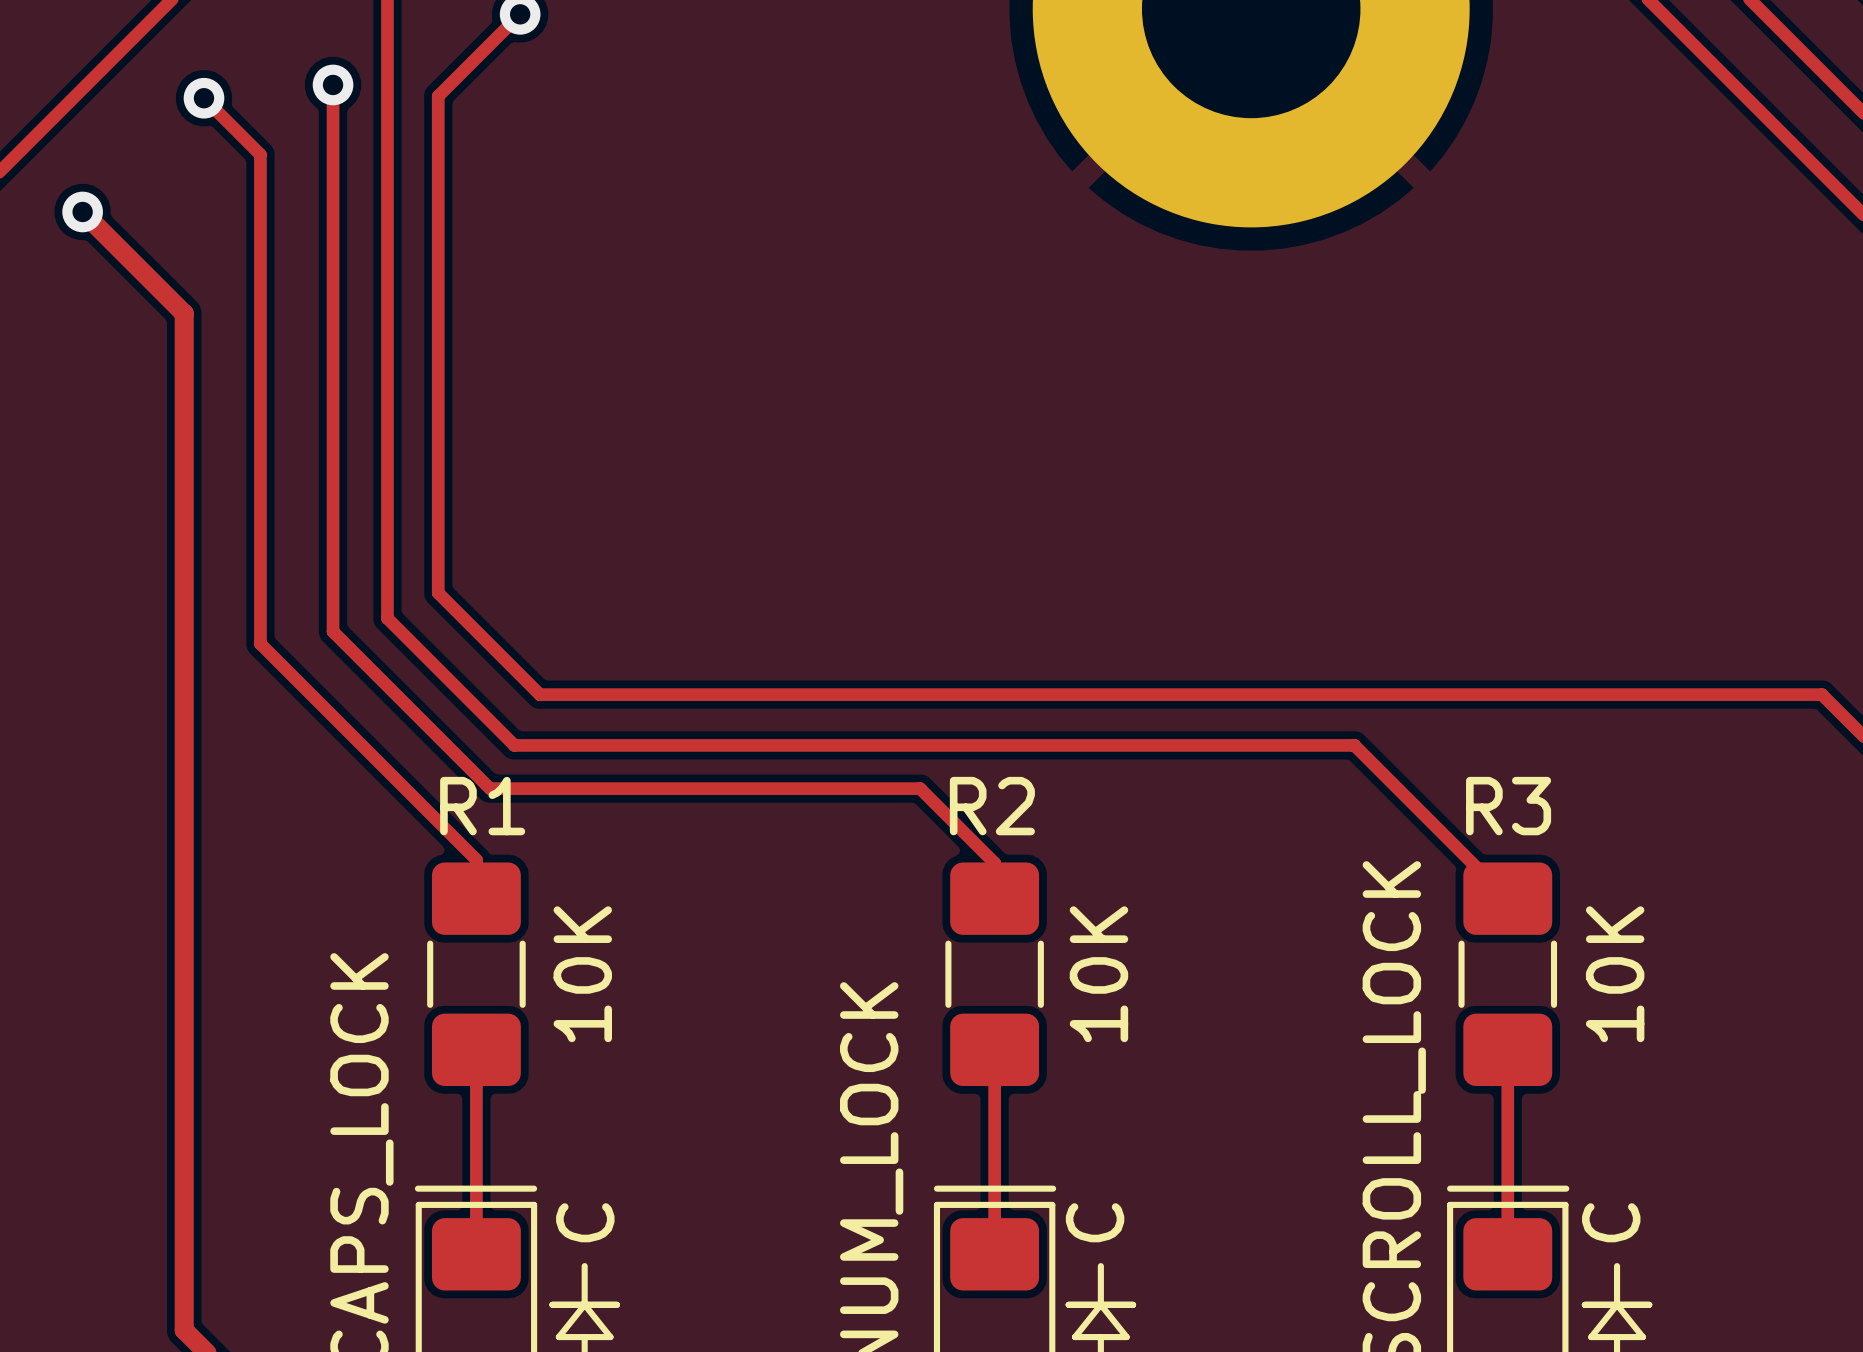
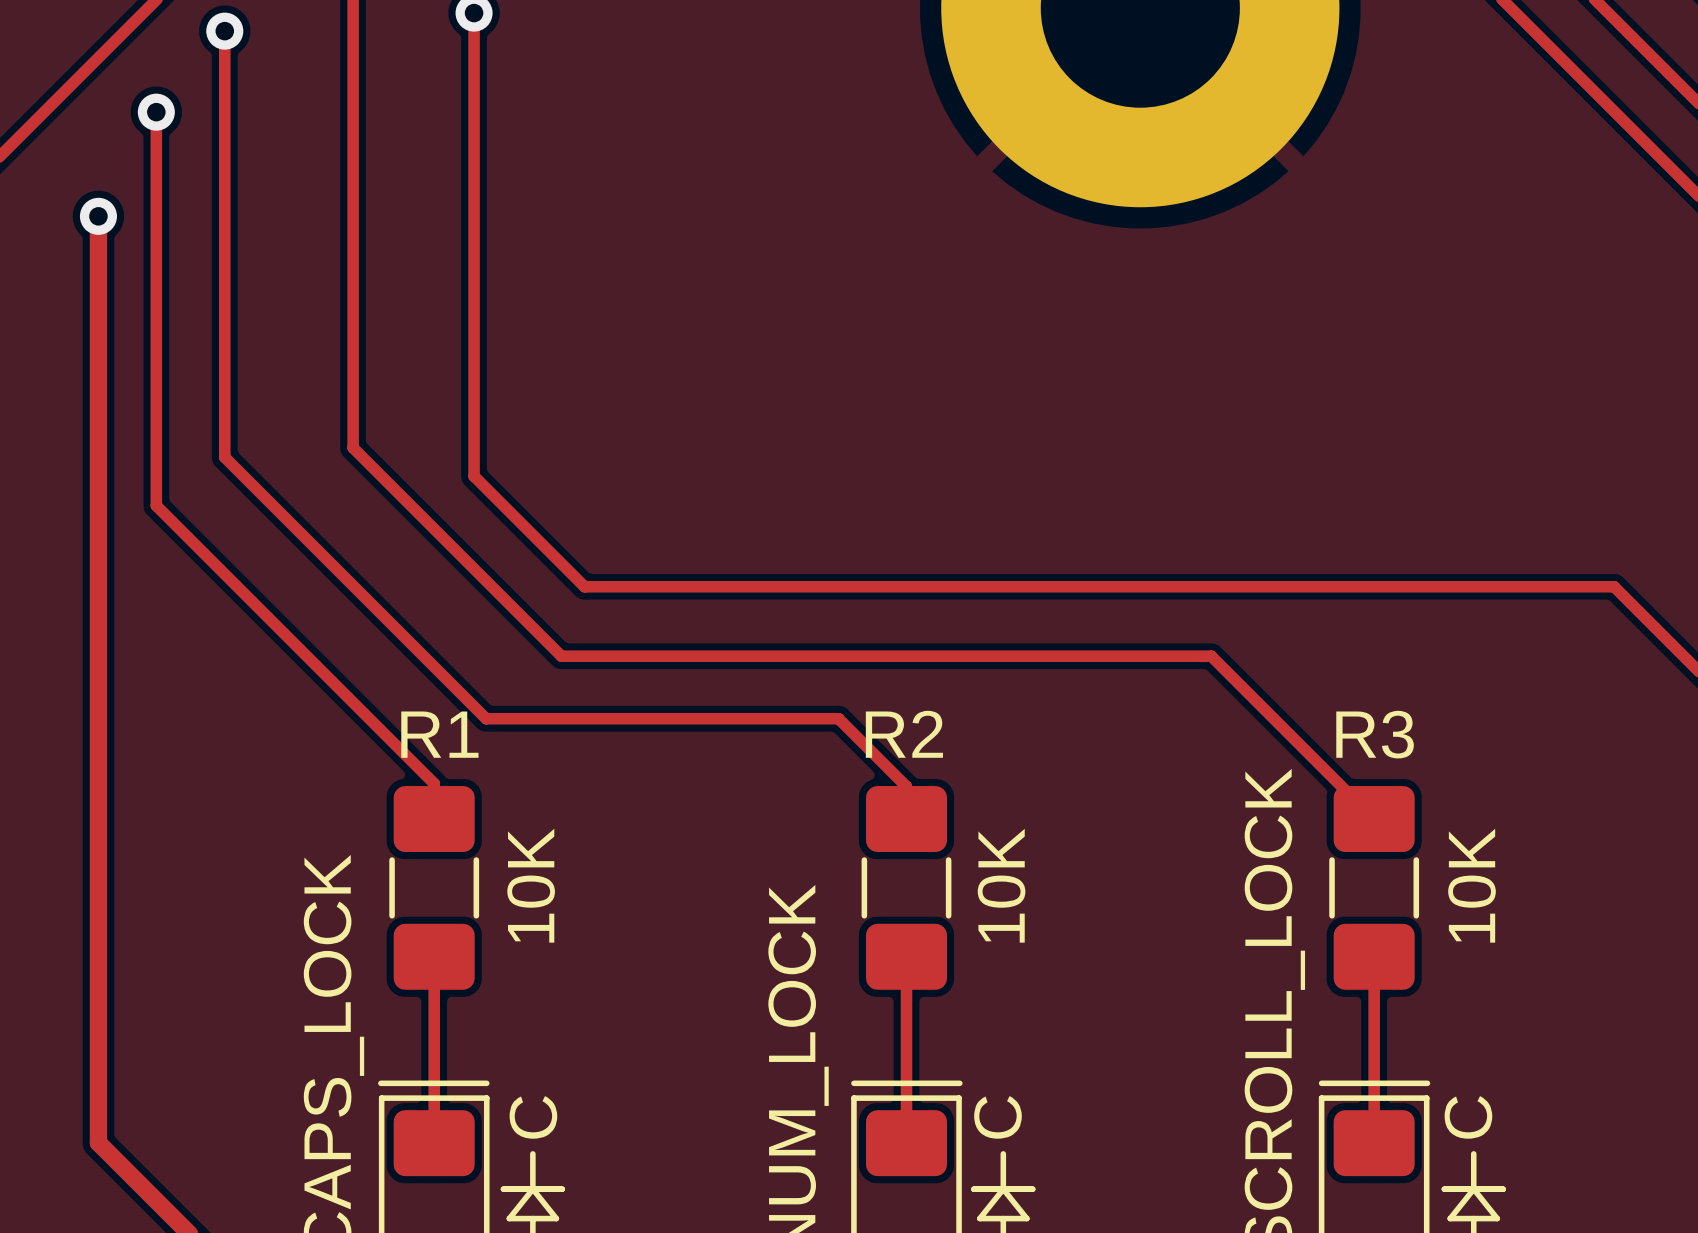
track: (520, 14) (438, 96) (438, 593) (539, 694) (1821, 694) -> (474, 13) (474, 476) (584, 586) (1614, 586) (1660, 633)
via: none -> (224, 31)
track: (333, 84) (333, 631) (489, 788) (533, 788) -> (224, 31) (224, 457) (486, 718)
via: (333, 84) -> none
track: (203, 98) (260, 154) (260, 643) -> (156, 112) (156, 505) (237, 586)
via position: (203, 98) -> (156, 112)
track: (82, 211) (184, 313) (184, 1330) -> (98, 216) (98, 1142) (167, 1212)
via position: (82, 211) -> (98, 216)
track: (387, 491) (387, 618) (514, 745) (1354, 745) -> (353, 447) (561, 656) (1211, 656) (1234, 679)

